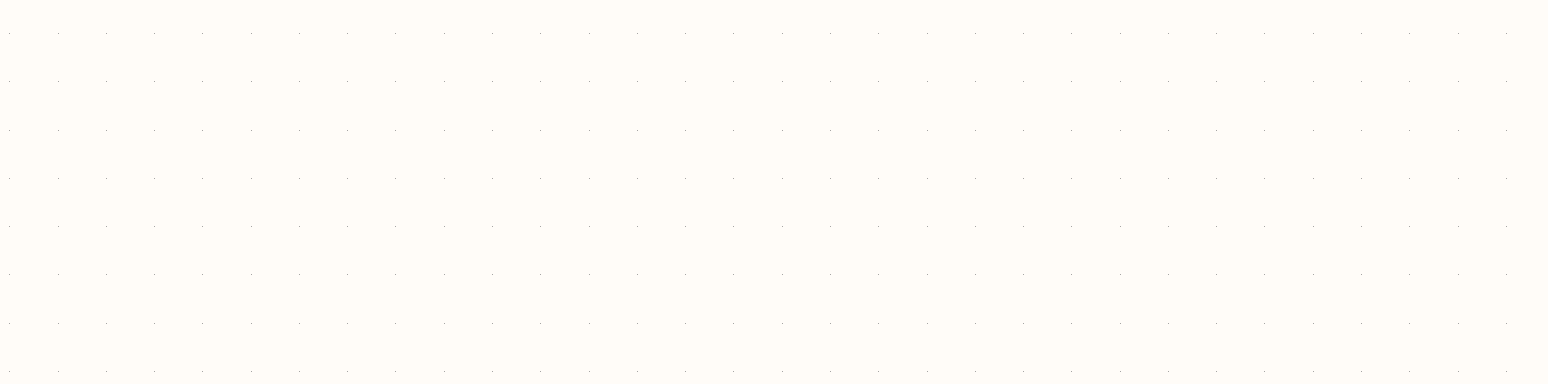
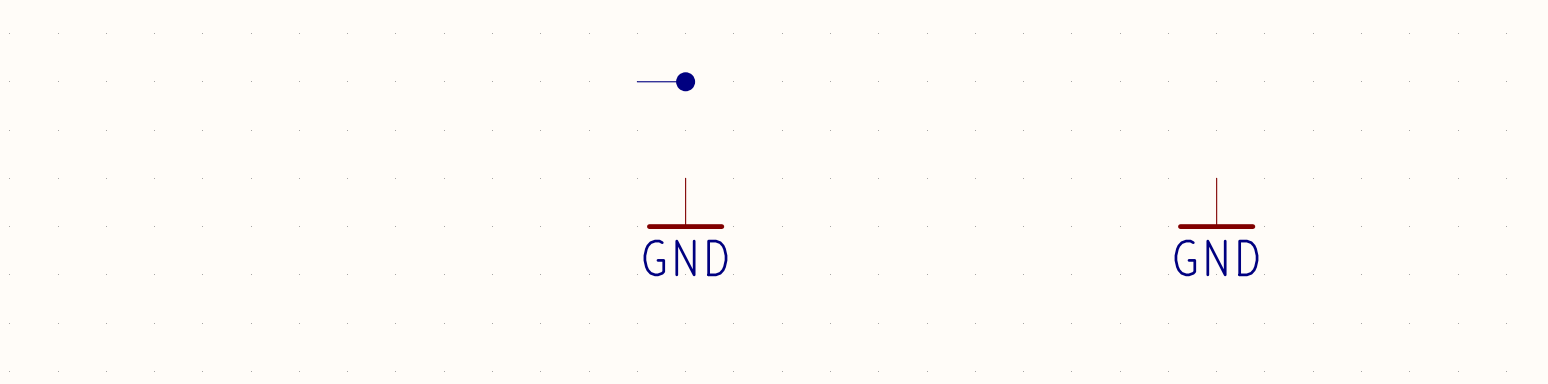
wire: none -> (637, 81) (685, 81)
junction: none -> (685, 81)
power symbol: none -> GND (685, 203)
power symbol: none -> GND (1216, 203)

